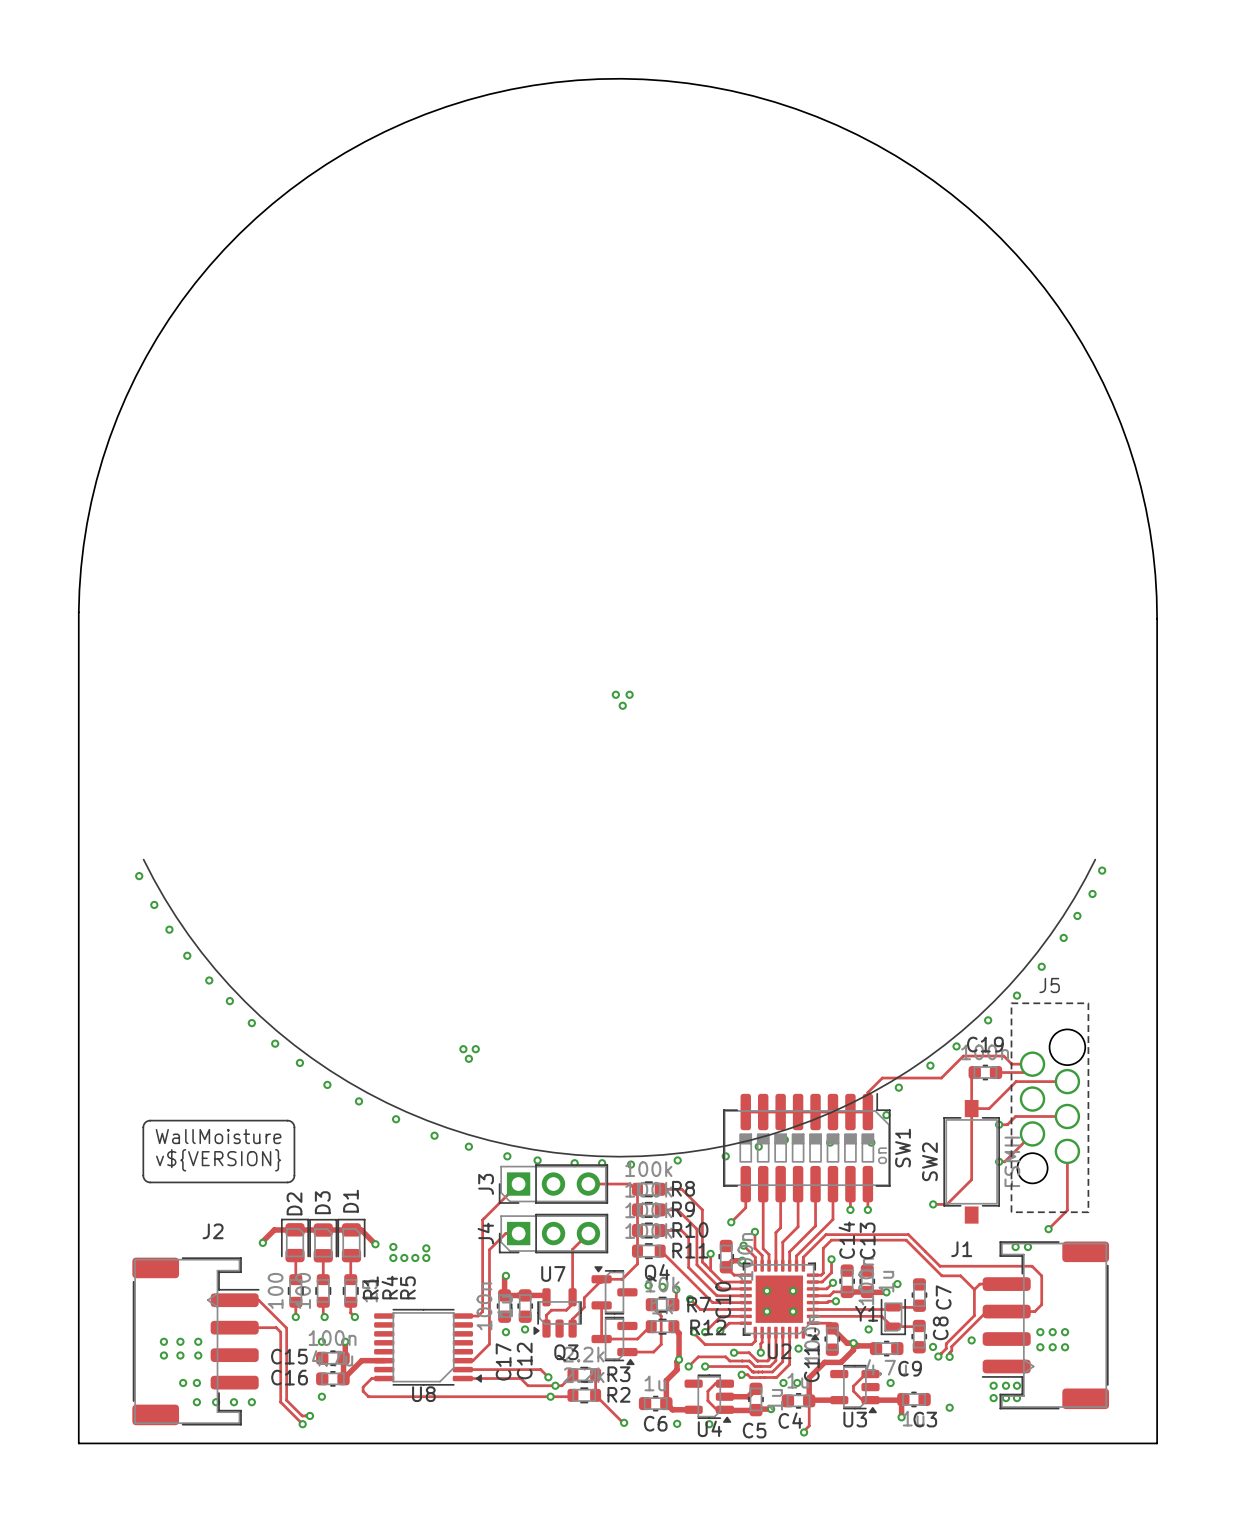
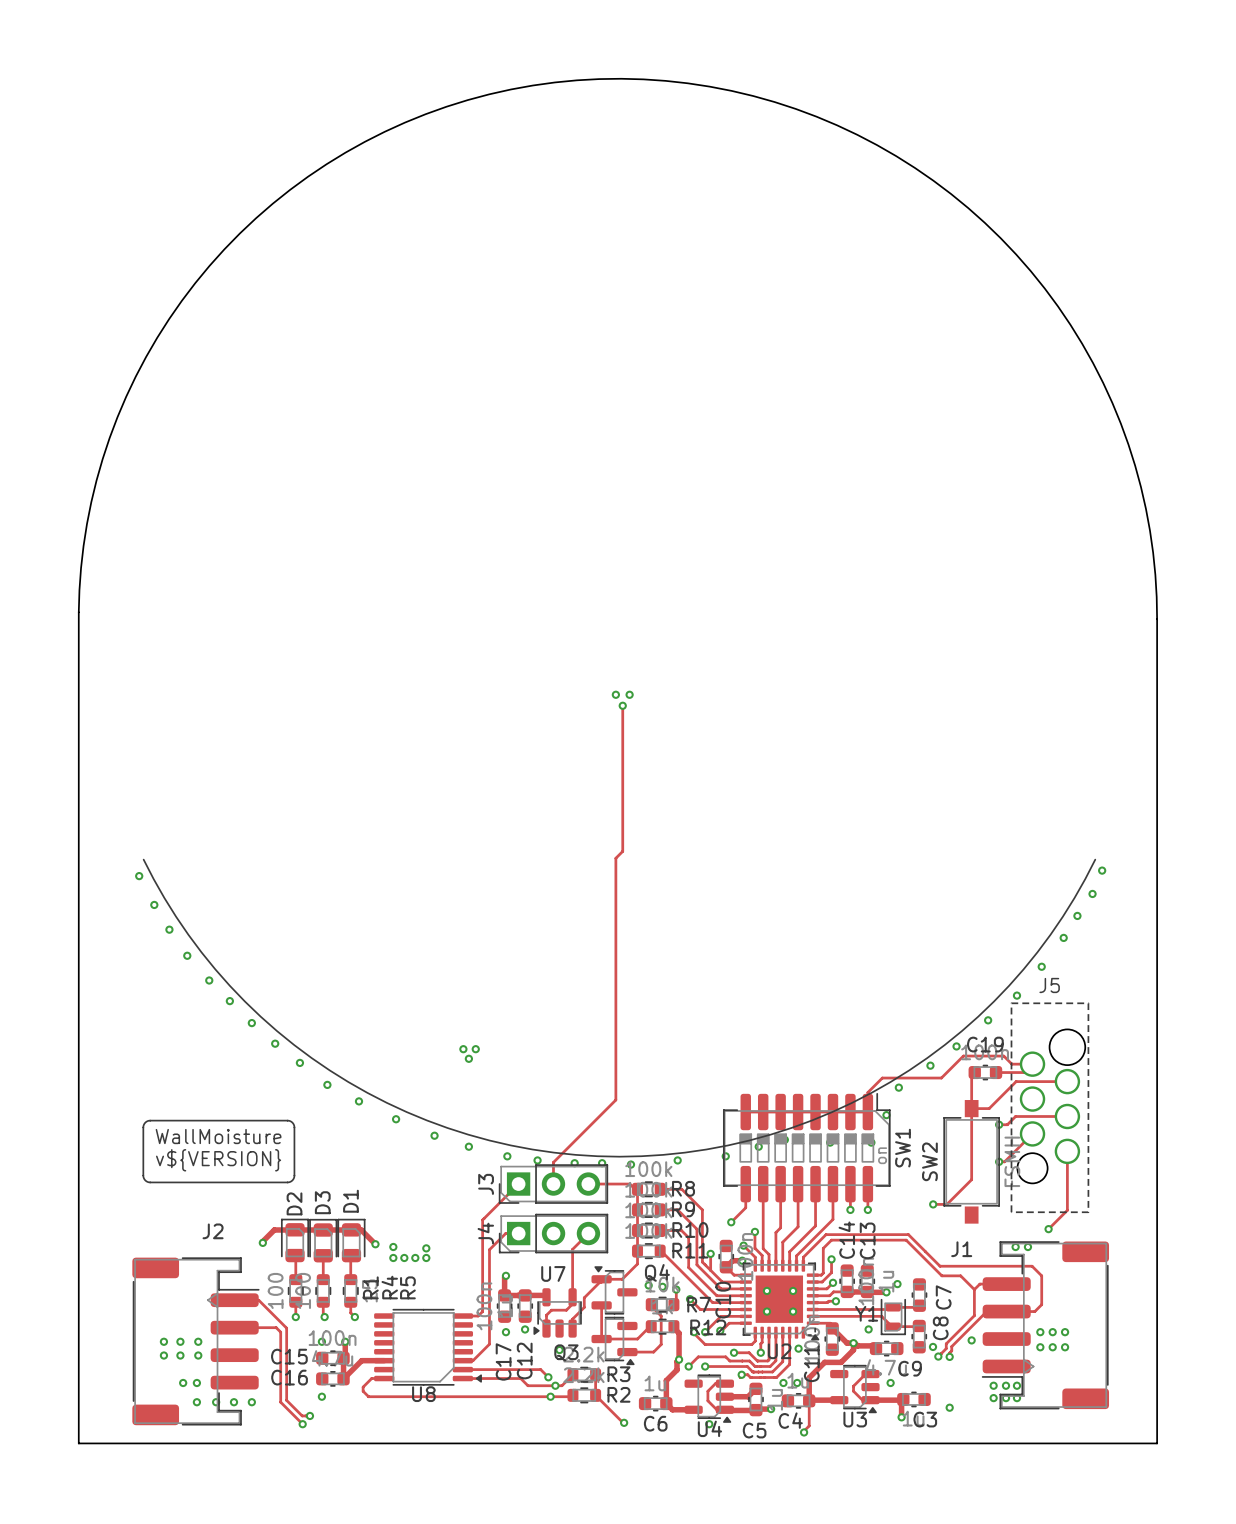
track: none -> (622, 708) (622, 851) (615, 858) (615, 1100) (553, 1162) (553, 1184)
via: none -> (559, 1350)
via: (677, 1423) -> none

